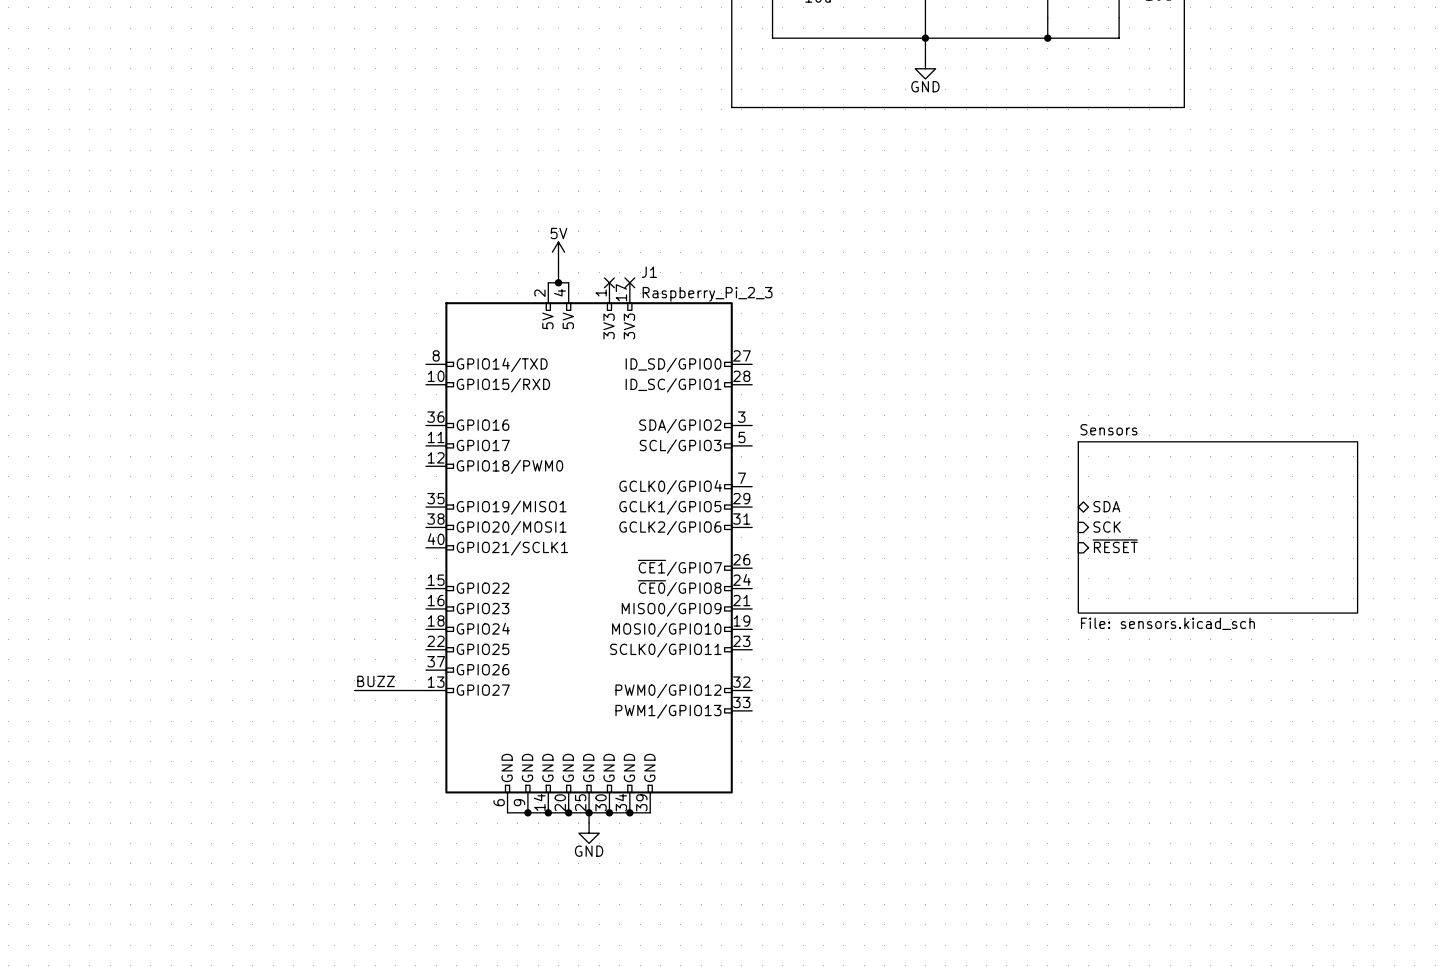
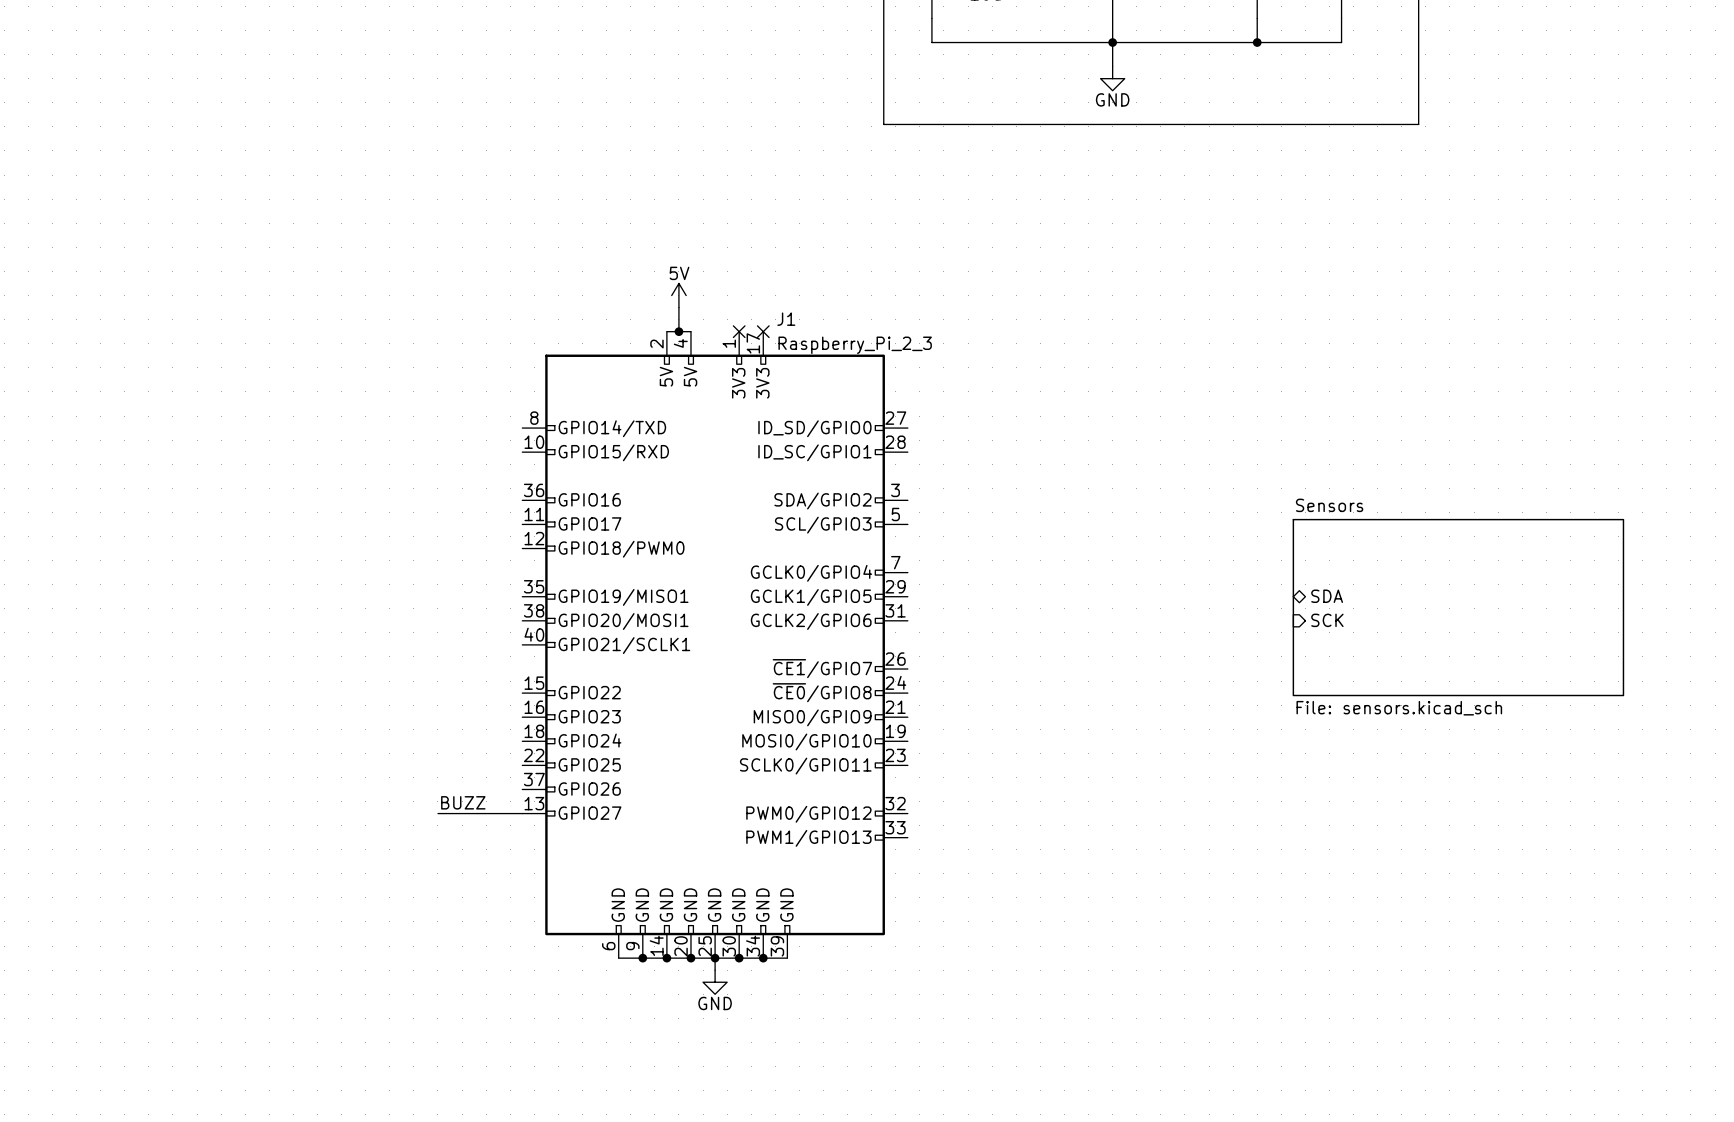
sheet Sensors: none -> File: sensors.kicad_sch (1458, 607)
sheet Sensors: File: sensors.kicad_sch (1217, 527) -> none
sheet pin: ~{RESET} (1115, 546) -> none

